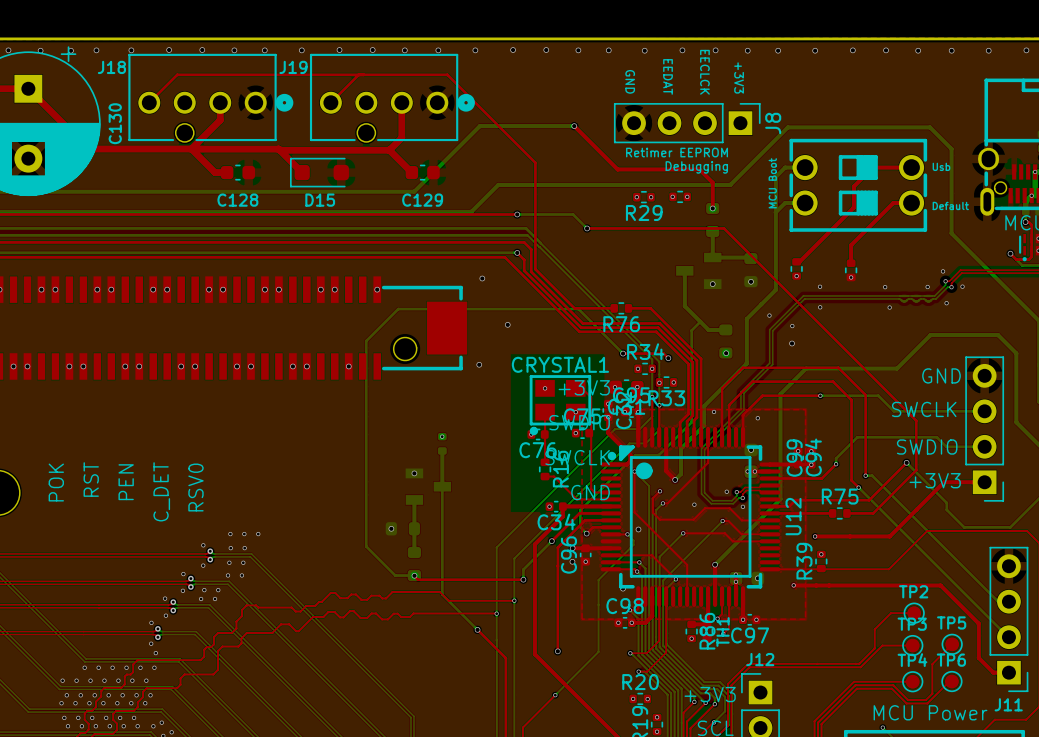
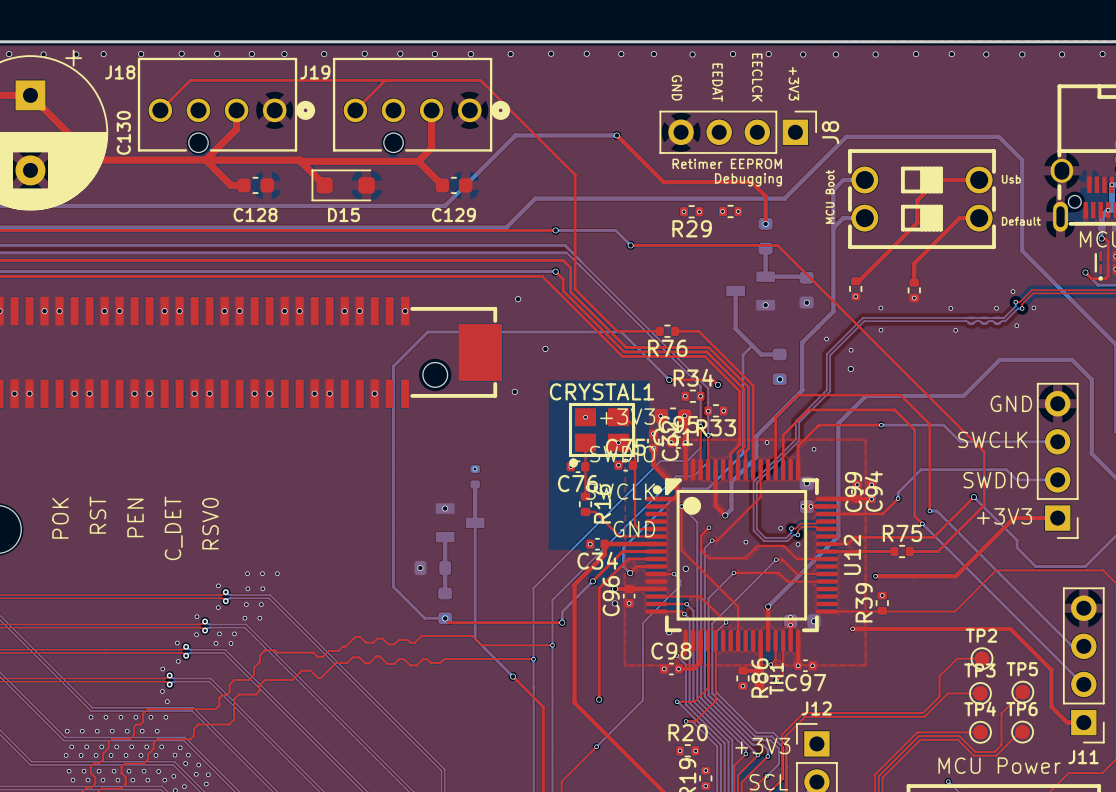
via: none -> (180, 747)
via: none -> (174, 755)
via: none -> (188, 755)
via: none -> (185, 763)
via: none -> (198, 765)
via: none -> (158, 771)
via: none -> (196, 774)
via: none -> (208, 774)
via: none -> (206, 784)

